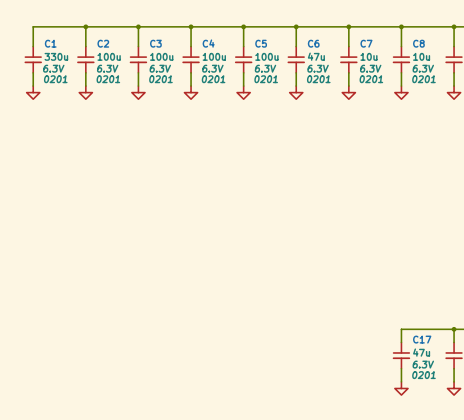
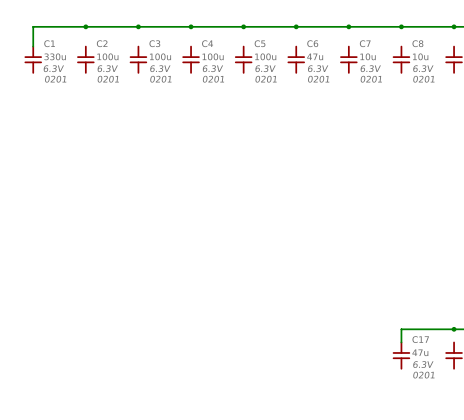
wire: (85, 26) (85, 46) -> none
wire: (138, 26) (138, 46) -> none
wire: (191, 26) (191, 46) -> none
wire: (243, 26) (243, 46) -> none
wire: (296, 26) (296, 46) -> none
wire: (348, 26) (348, 46) -> none
wire: (401, 26) (401, 46) -> none
wire: (454, 26) (454, 46) -> none
wire: (33, 72) (33, 86) -> none
wire: (85, 72) (85, 86) -> none
wire: (138, 72) (138, 86) -> none
wire: (191, 72) (191, 86) -> none
wire: (243, 72) (243, 86) -> none
wire: (296, 72) (296, 86) -> none
wire: (348, 72) (348, 86) -> none
wire: (401, 72) (401, 86) -> none
wire: (454, 72) (454, 86) -> none
power symbol: (33, 92) -> none
power symbol: (85, 92) -> none
power symbol: (138, 92) -> none
power symbol: (191, 92) -> none
power symbol: (243, 92) -> none
power symbol: (296, 92) -> none
power symbol: (348, 92) -> none
power symbol: (401, 92) -> none
power symbol: (454, 92) -> none
wire: (454, 329) (454, 342) -> none
wire: (401, 368) (401, 381) -> none
wire: (454, 368) (454, 381) -> none
power symbol: (401, 388) -> none
power symbol: (454, 388) -> none

